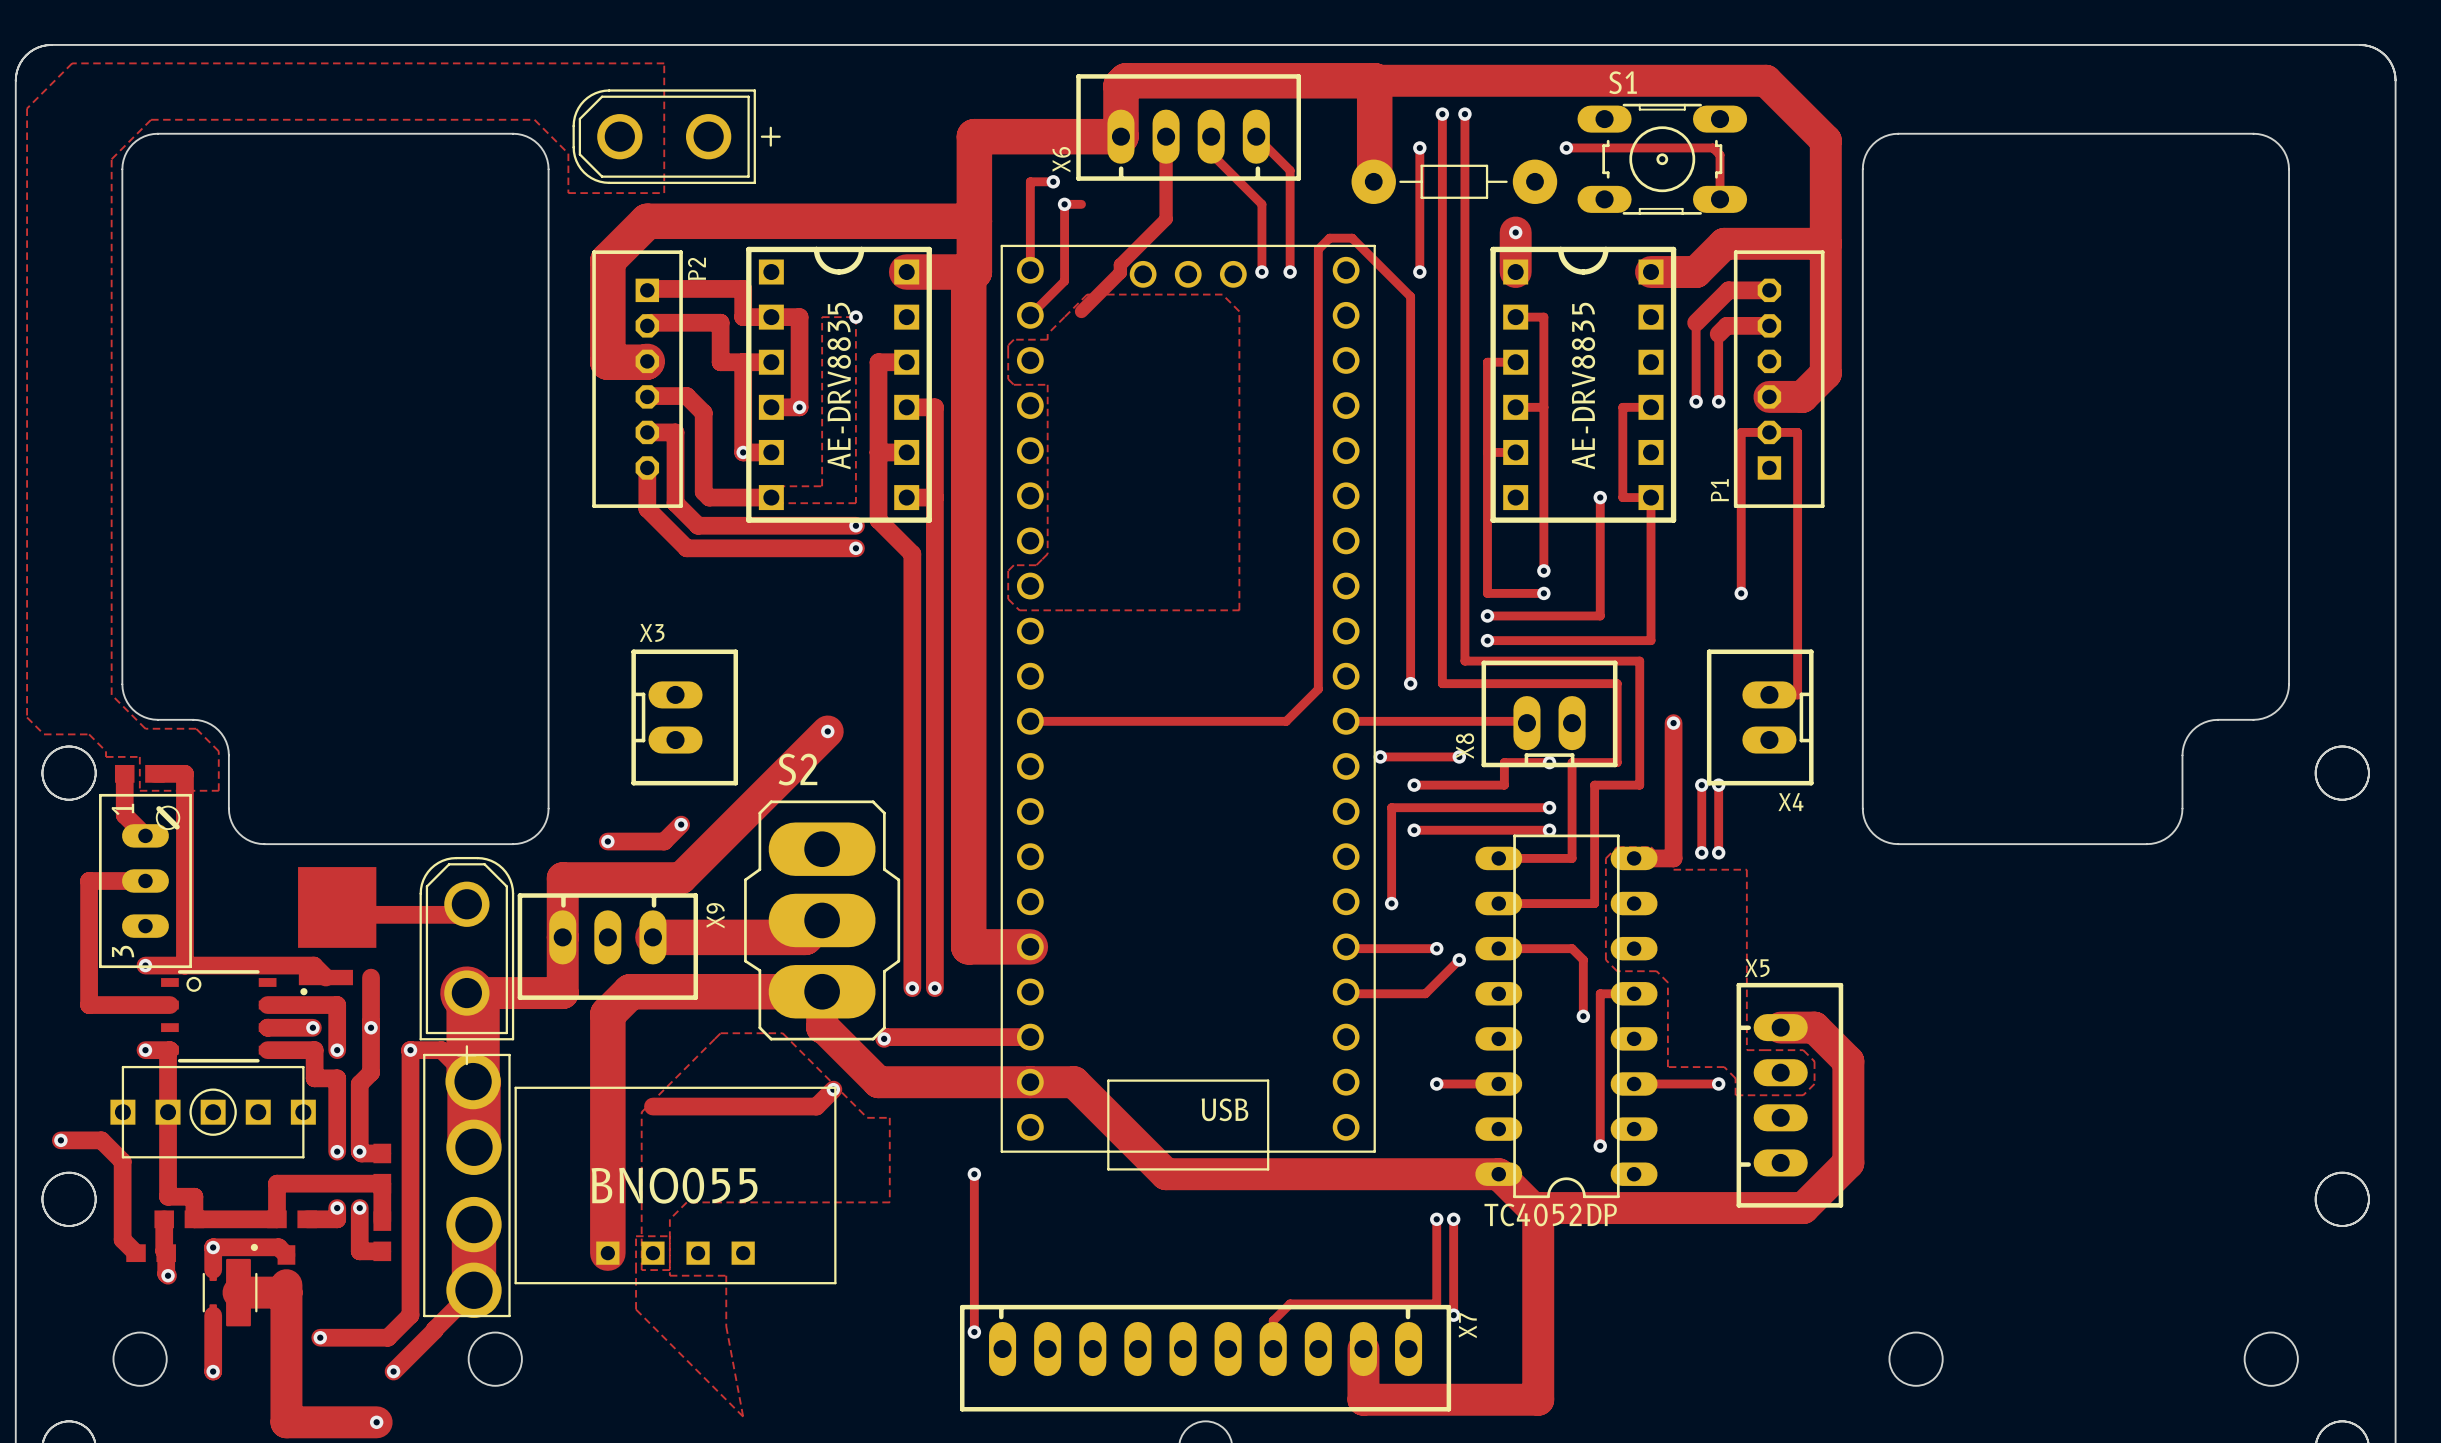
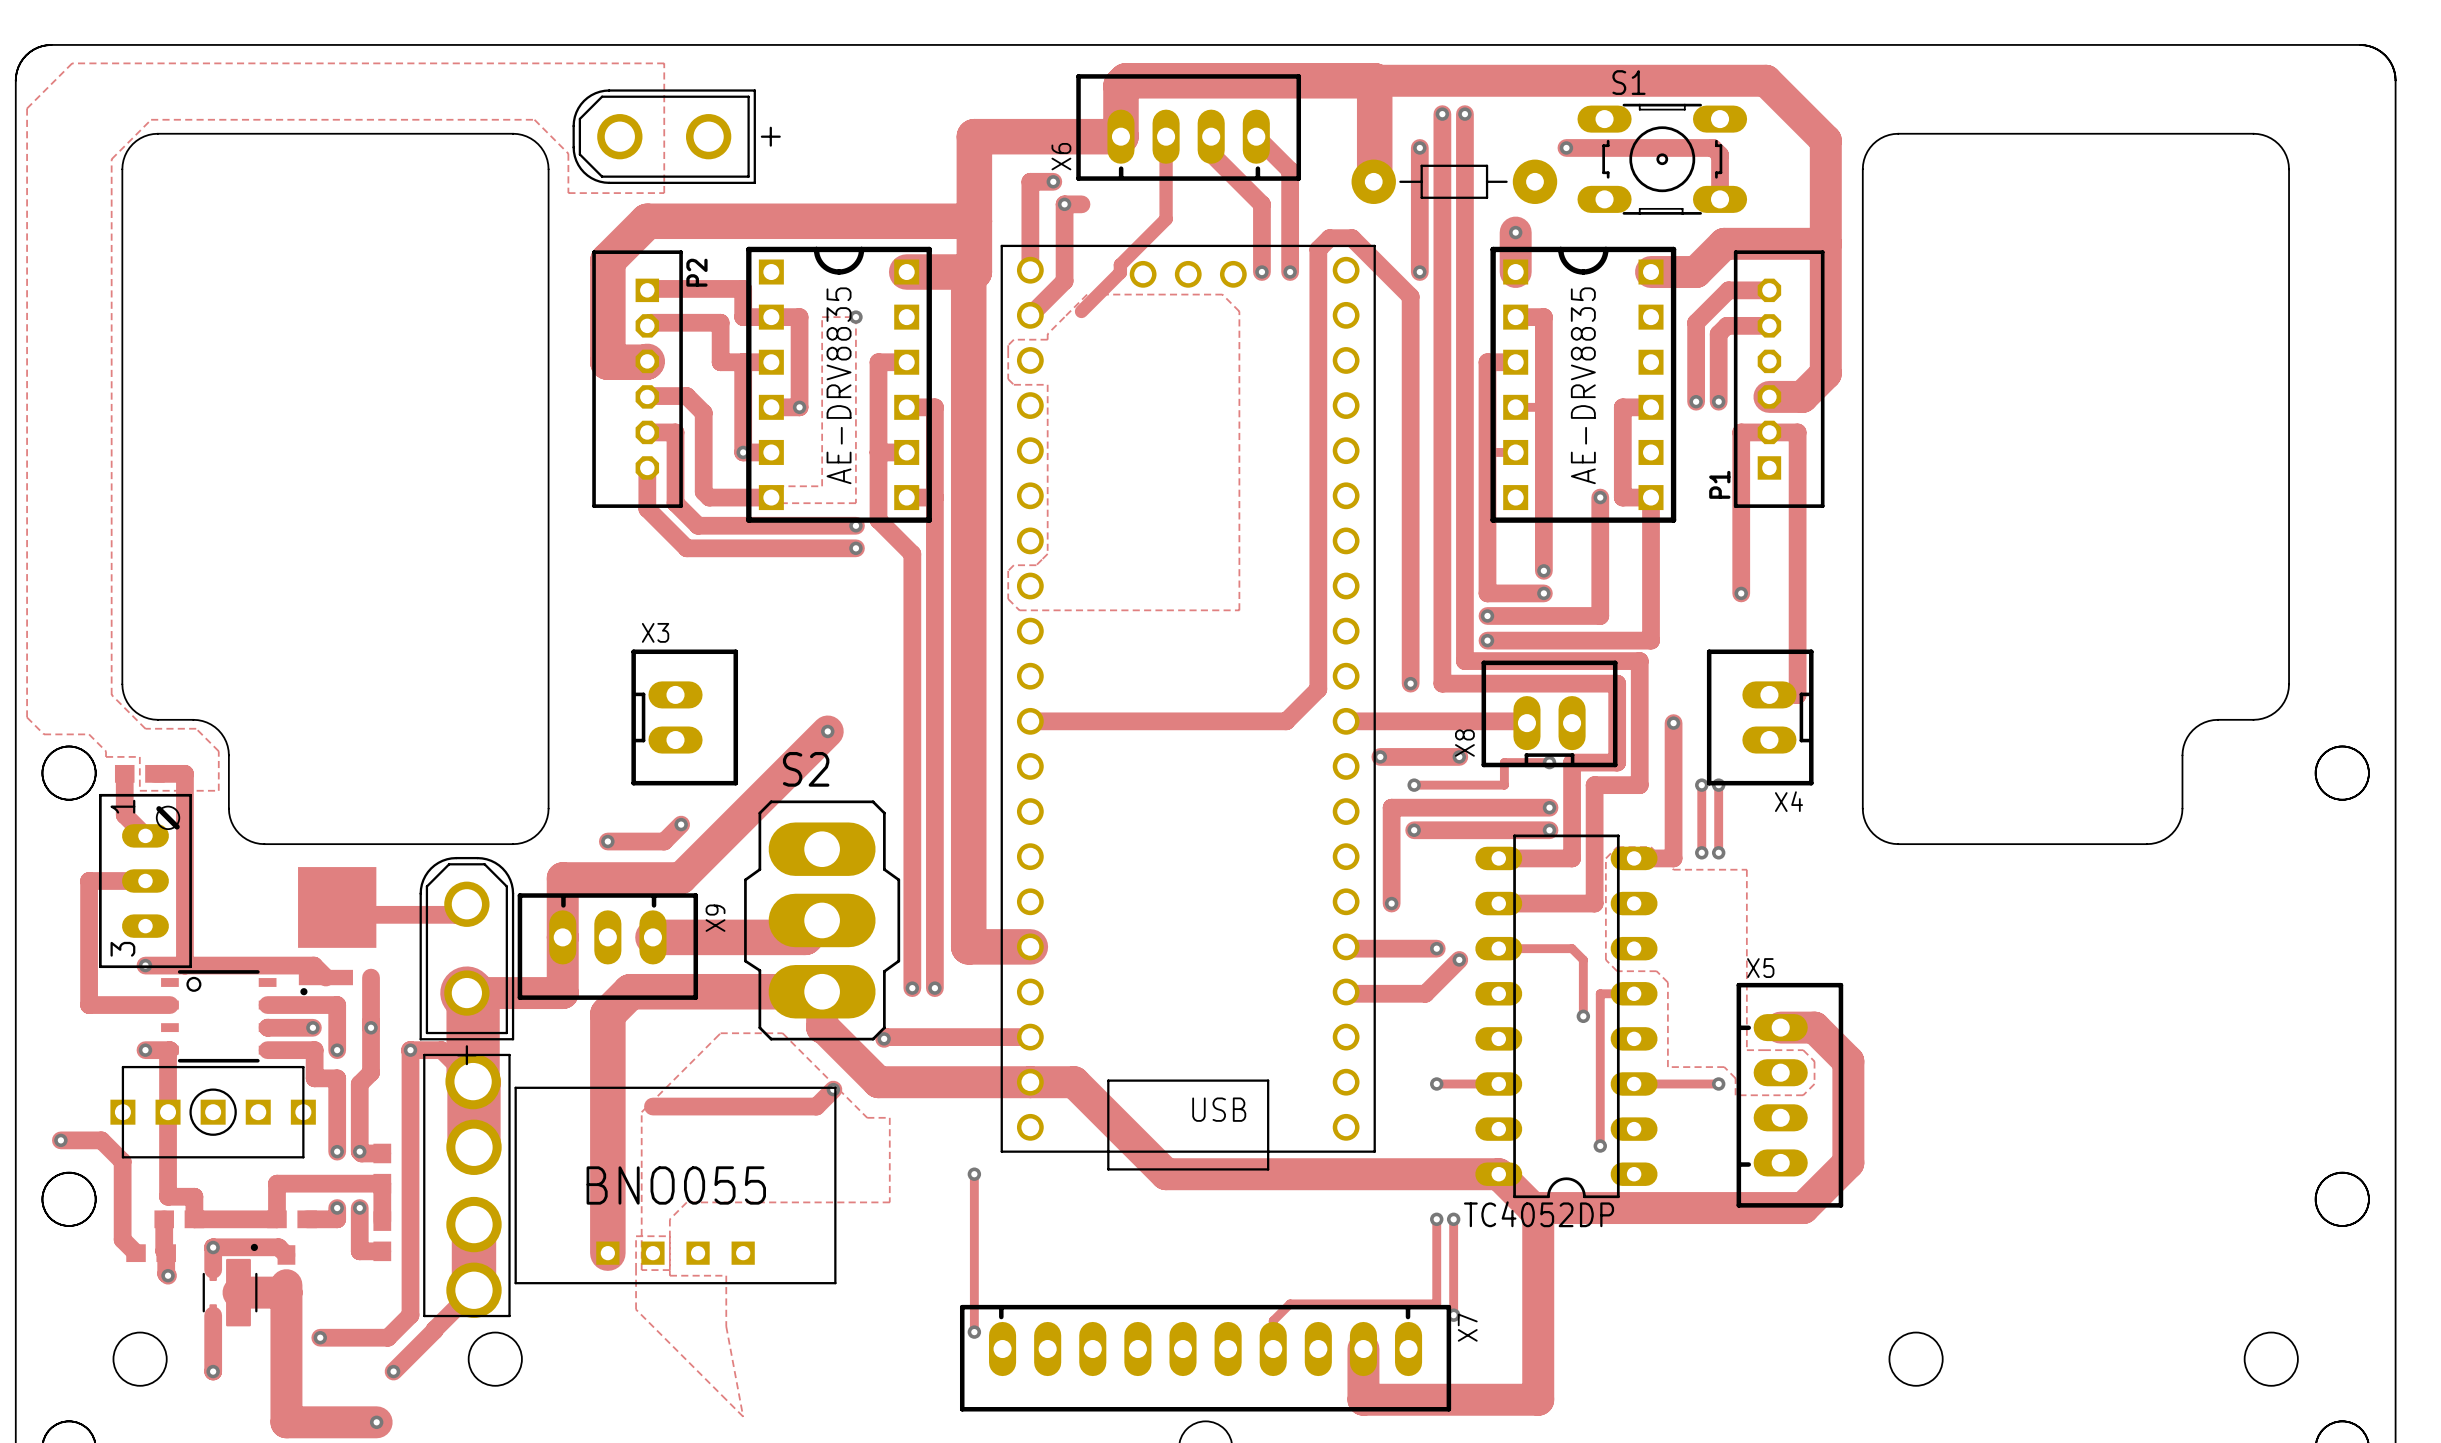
track width: thin (1442, 114) (1442, 683) (1617, 683) (1617, 762) (1572, 762) (1572, 858) (1498, 858) -> thick (1442, 114) (1442, 683) (1617, 683) (1617, 762) (1572, 762) (1572, 858) (1498, 858)
track width: thin (1464, 114) (1464, 661) (1639, 661) (1639, 785) (1594, 785) (1594, 903) (1498, 903) -> thick (1464, 114) (1464, 661) (1639, 661) (1639, 785) (1594, 785) (1594, 903) (1498, 903)
track width: thin (1211, 136) (1211, 153) (1261, 204) (1261, 272) -> thick (1211, 136) (1211, 153) (1261, 204) (1261, 272)
track width: thin (1256, 136) (1290, 170) (1290, 272) -> thick (1256, 136) (1290, 170) (1290, 272)
track width: thin (1419, 147) (1419, 272) -> thick (1419, 147) (1419, 272)
track width: thin (1566, 147) (1713, 147) (1720, 154) (1720, 199) -> thick (1566, 147) (1713, 147) (1720, 154) (1720, 199)
track width: thin (1053, 181) (1030, 181) (1030, 270) -> thick (1053, 181) (1030, 181) (1030, 270)
track width: thin (1081, 204) (1064, 204) (1064, 281) (1030, 315) -> thick (1081, 204) (1064, 204) (1064, 281) (1030, 315)
track width: thin (1515, 317) (1543, 317) (1543, 570) -> thick (1515, 317) (1543, 317) (1543, 570)
track width: thin (1696, 322) (1696, 401) -> thick (1696, 322) (1696, 401)
track width: thin (1718, 334) (1718, 401) -> thick (1718, 334) (1718, 401)
track width: thin (1515, 362) (1487, 362) (1487, 593) (1543, 593) -> thick (1515, 362) (1487, 362) (1487, 593) (1543, 593)
track width: thin (1651, 407) (1622, 407) (1622, 497) (1651, 497) (1651, 640) (1487, 640) -> thick (1651, 407) (1622, 407) (1622, 497) (1651, 497) (1651, 640) (1487, 640)
track width: thin (1600, 497) (1600, 615) (1487, 615) -> thick (1600, 497) (1600, 615) (1487, 615)
track width: thin (1741, 593) (1741, 432) (1797, 432) (1797, 694) (1769, 694) -> thick (1741, 593) (1741, 432) (1797, 432) (1797, 694) (1769, 694)
track width: thin (1410, 683) (1410, 296) (1352, 238) (1329, 238) (1318, 249) (1318, 689) (1286, 721) (1030, 721) -> thick (1410, 683) (1410, 296) (1352, 238) (1329, 238) (1318, 249) (1318, 689) (1286, 721) (1030, 721)
track width: thin (1346, 721) (1525, 721) (1526, 723) -> thick (1346, 721) (1525, 721) (1526, 723)
track width: thin (1380, 756) (1459, 756) -> thick (1380, 756) (1459, 756)
track width: thin (1549, 807) (1391, 807) (1391, 903) -> thick (1549, 807) (1391, 807) (1391, 903)
track width: thin (1414, 830) (1549, 830) -> thick (1414, 830) (1549, 830)
track width: thin (1346, 946) (1347, 948) (1436, 948) -> thick (1346, 946) (1347, 948) (1436, 948)
track width: thin (1459, 959) (1425, 993) (1347, 993) (1346, 991) -> thick (1459, 959) (1425, 993) (1347, 993) (1346, 991)

